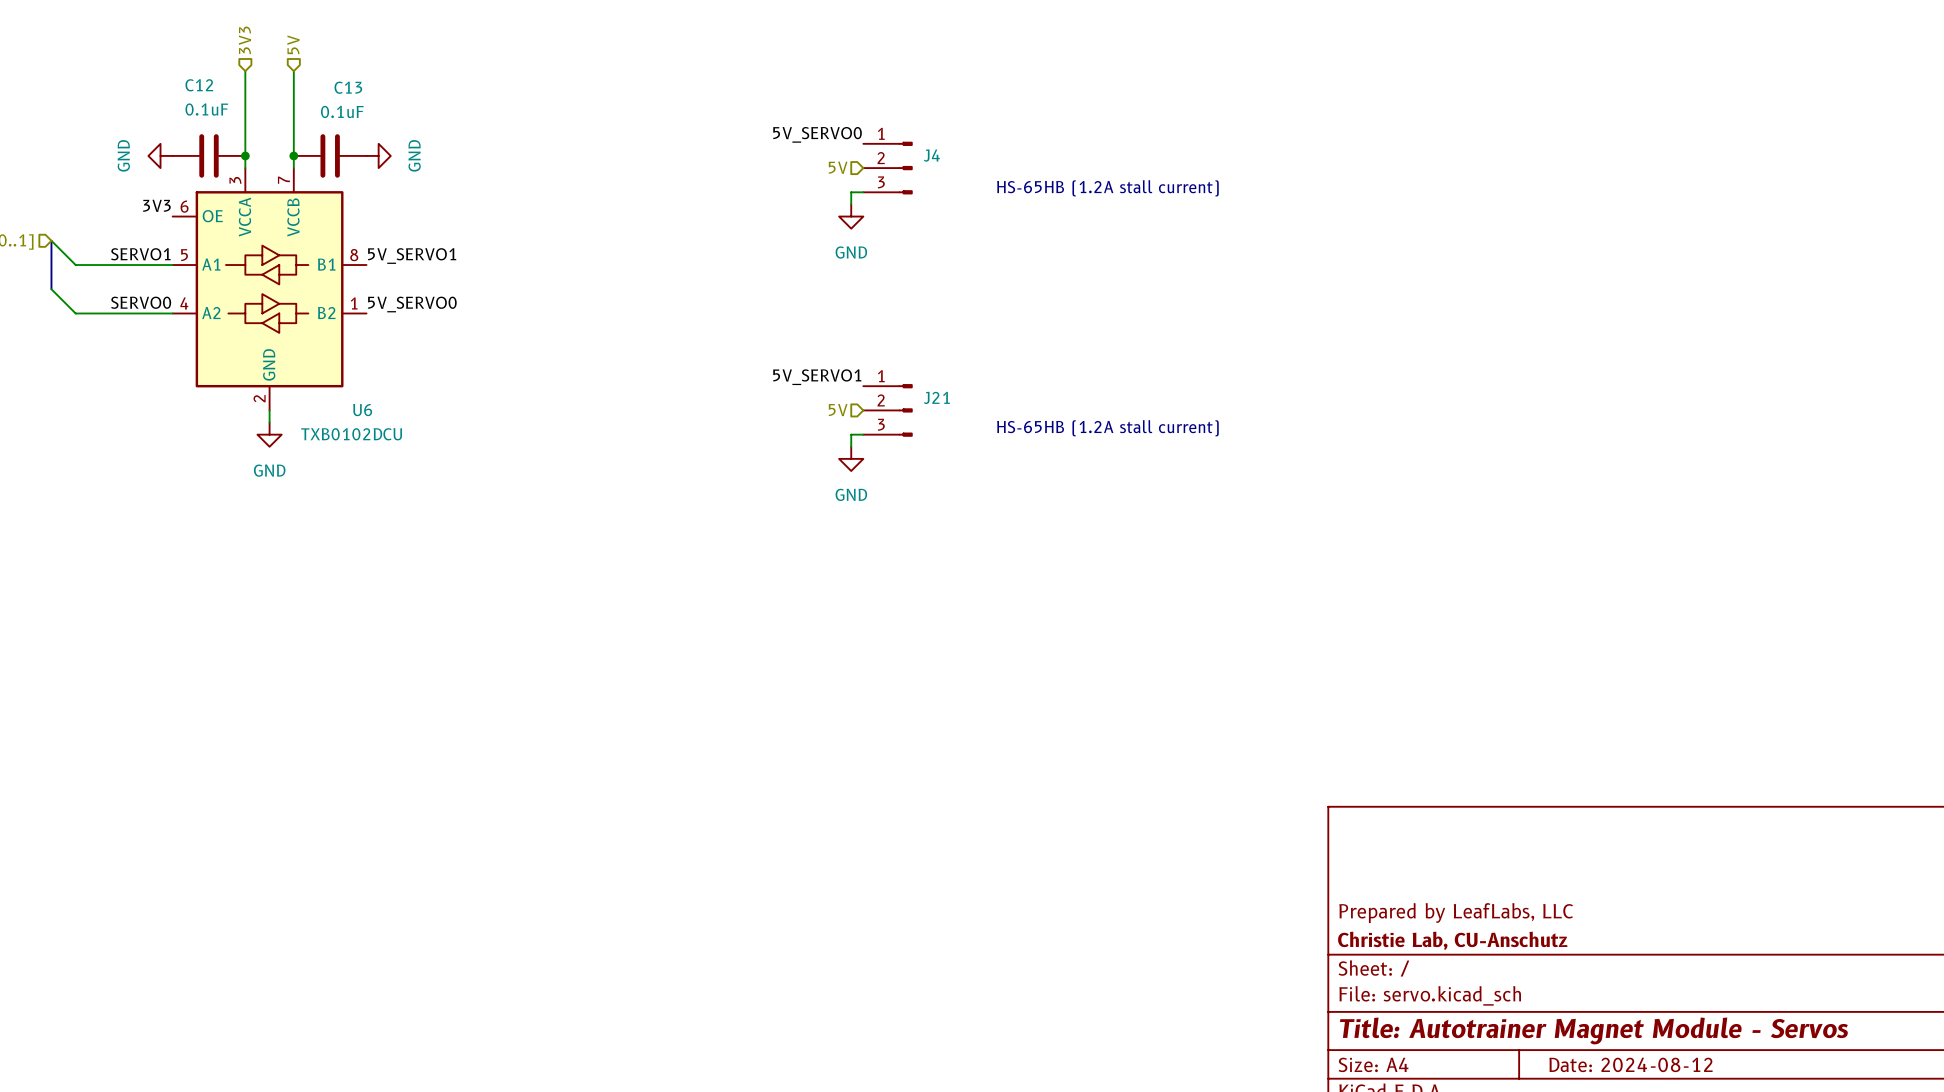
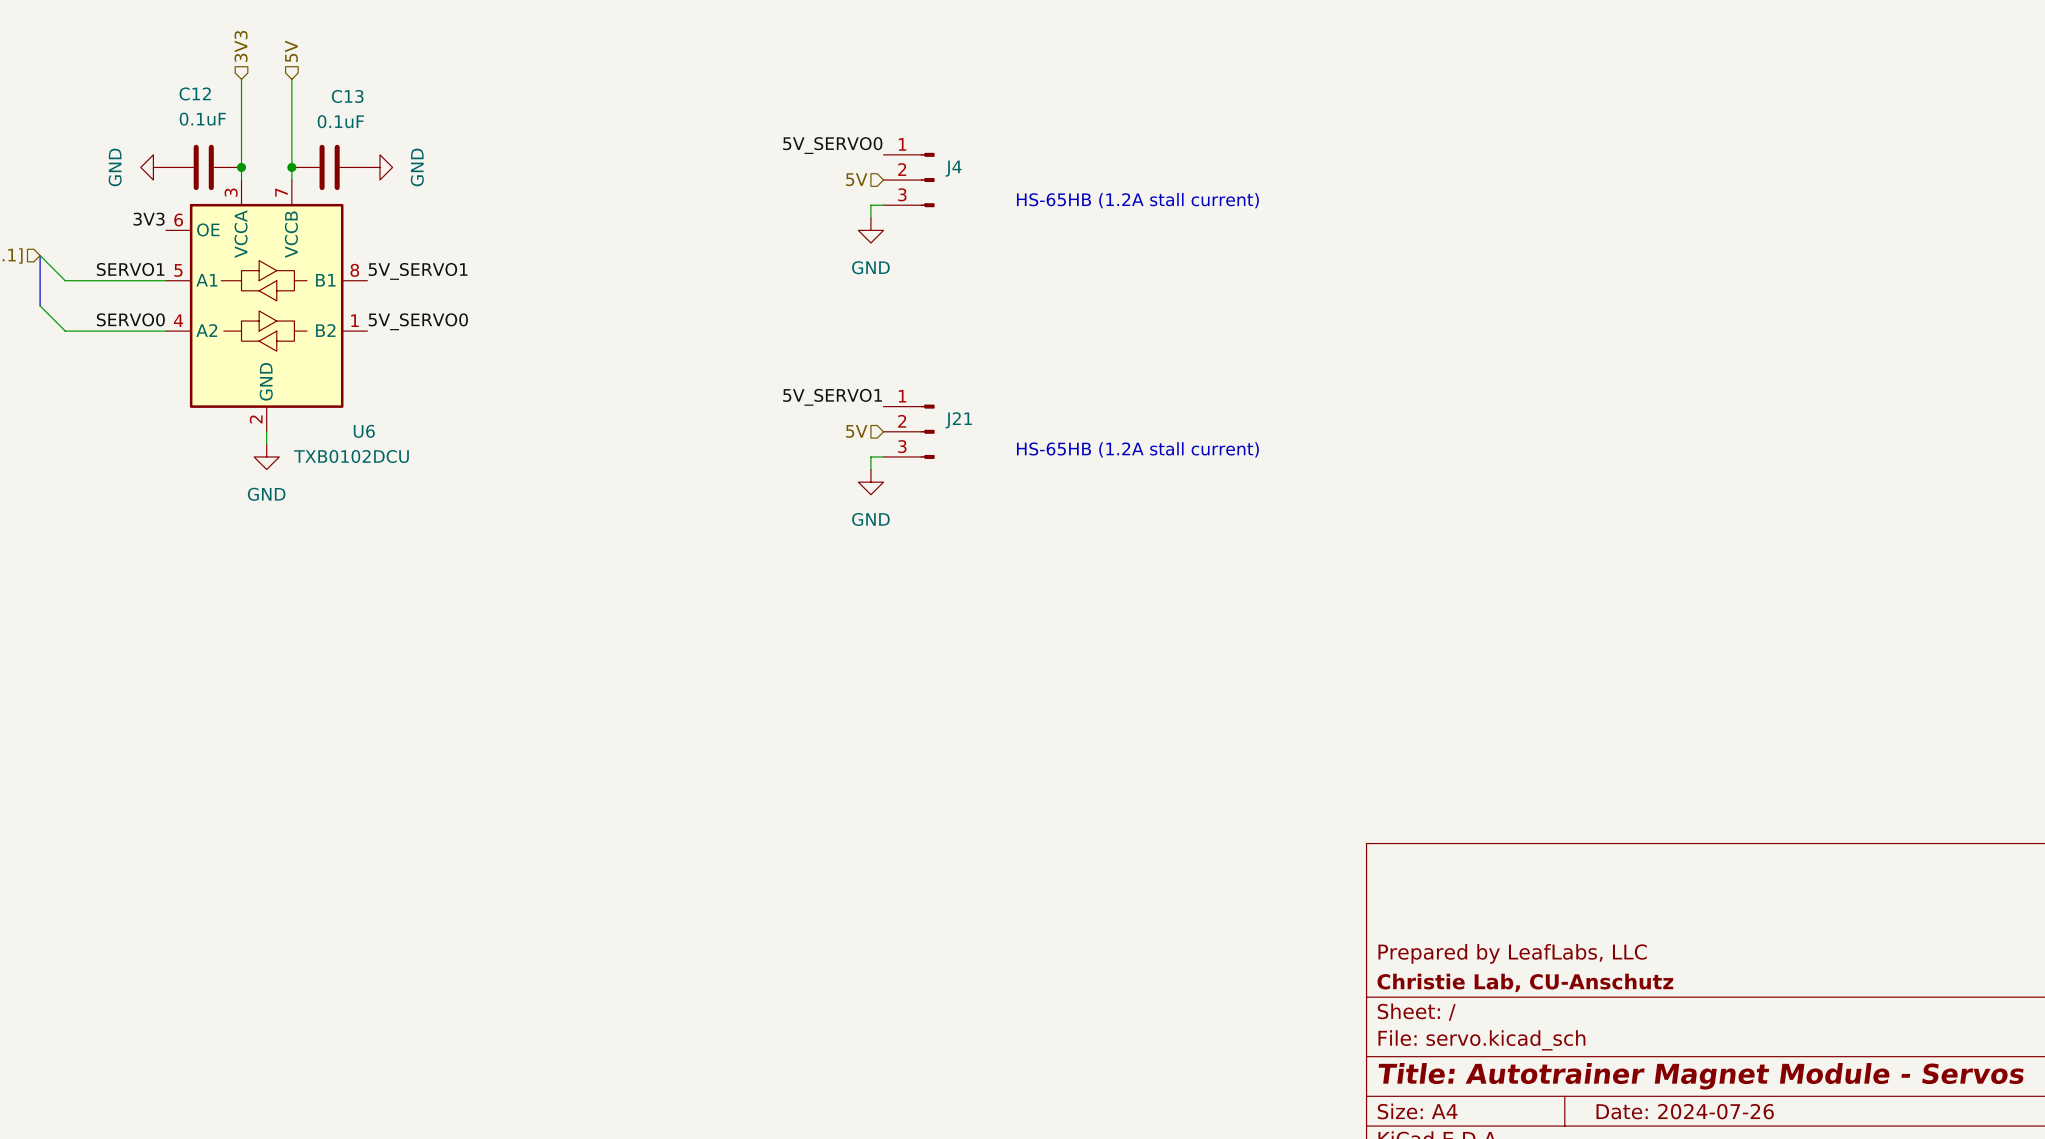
title block: Date: 2024-08-12 (1630, 1064) -> Date: 2024-07-26 (1685, 1111)

